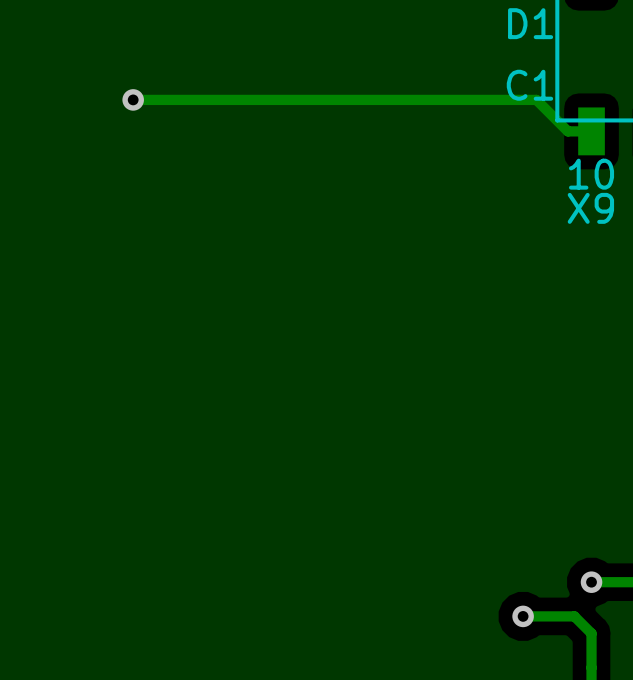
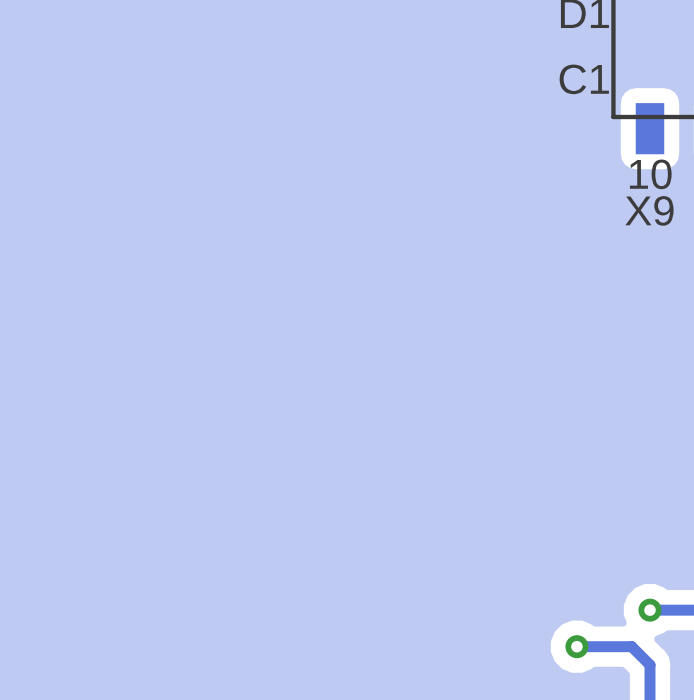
track: (133, 99) (536, 99) (567, 131) (591, 131) -> none
via: (133, 99) -> none

